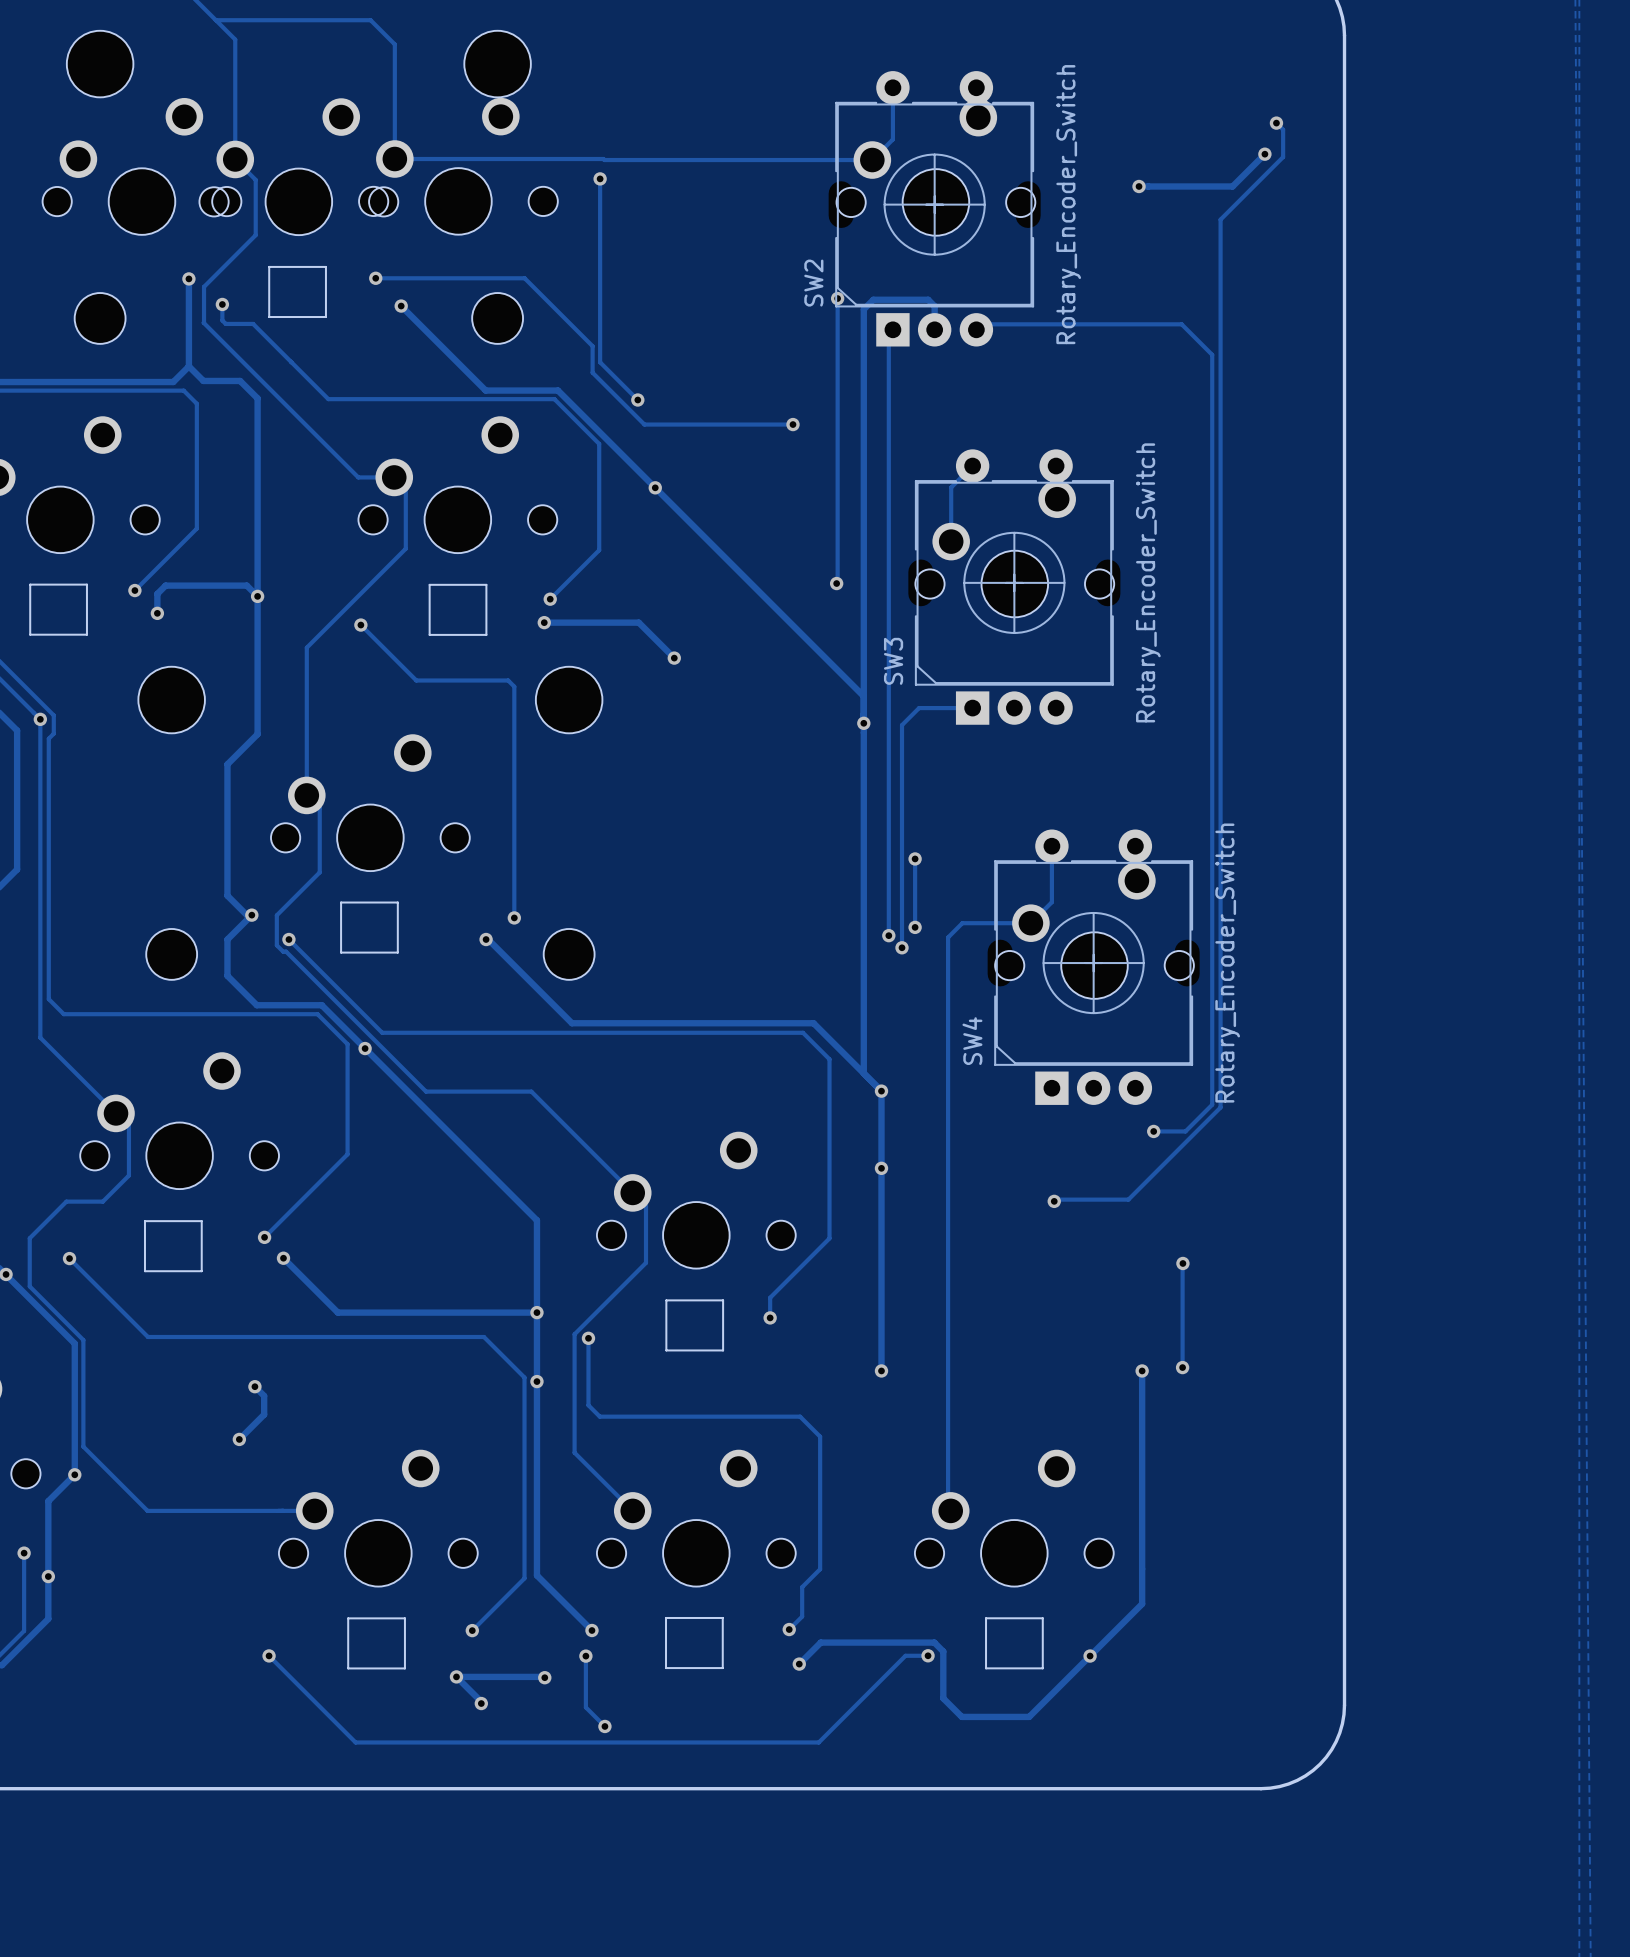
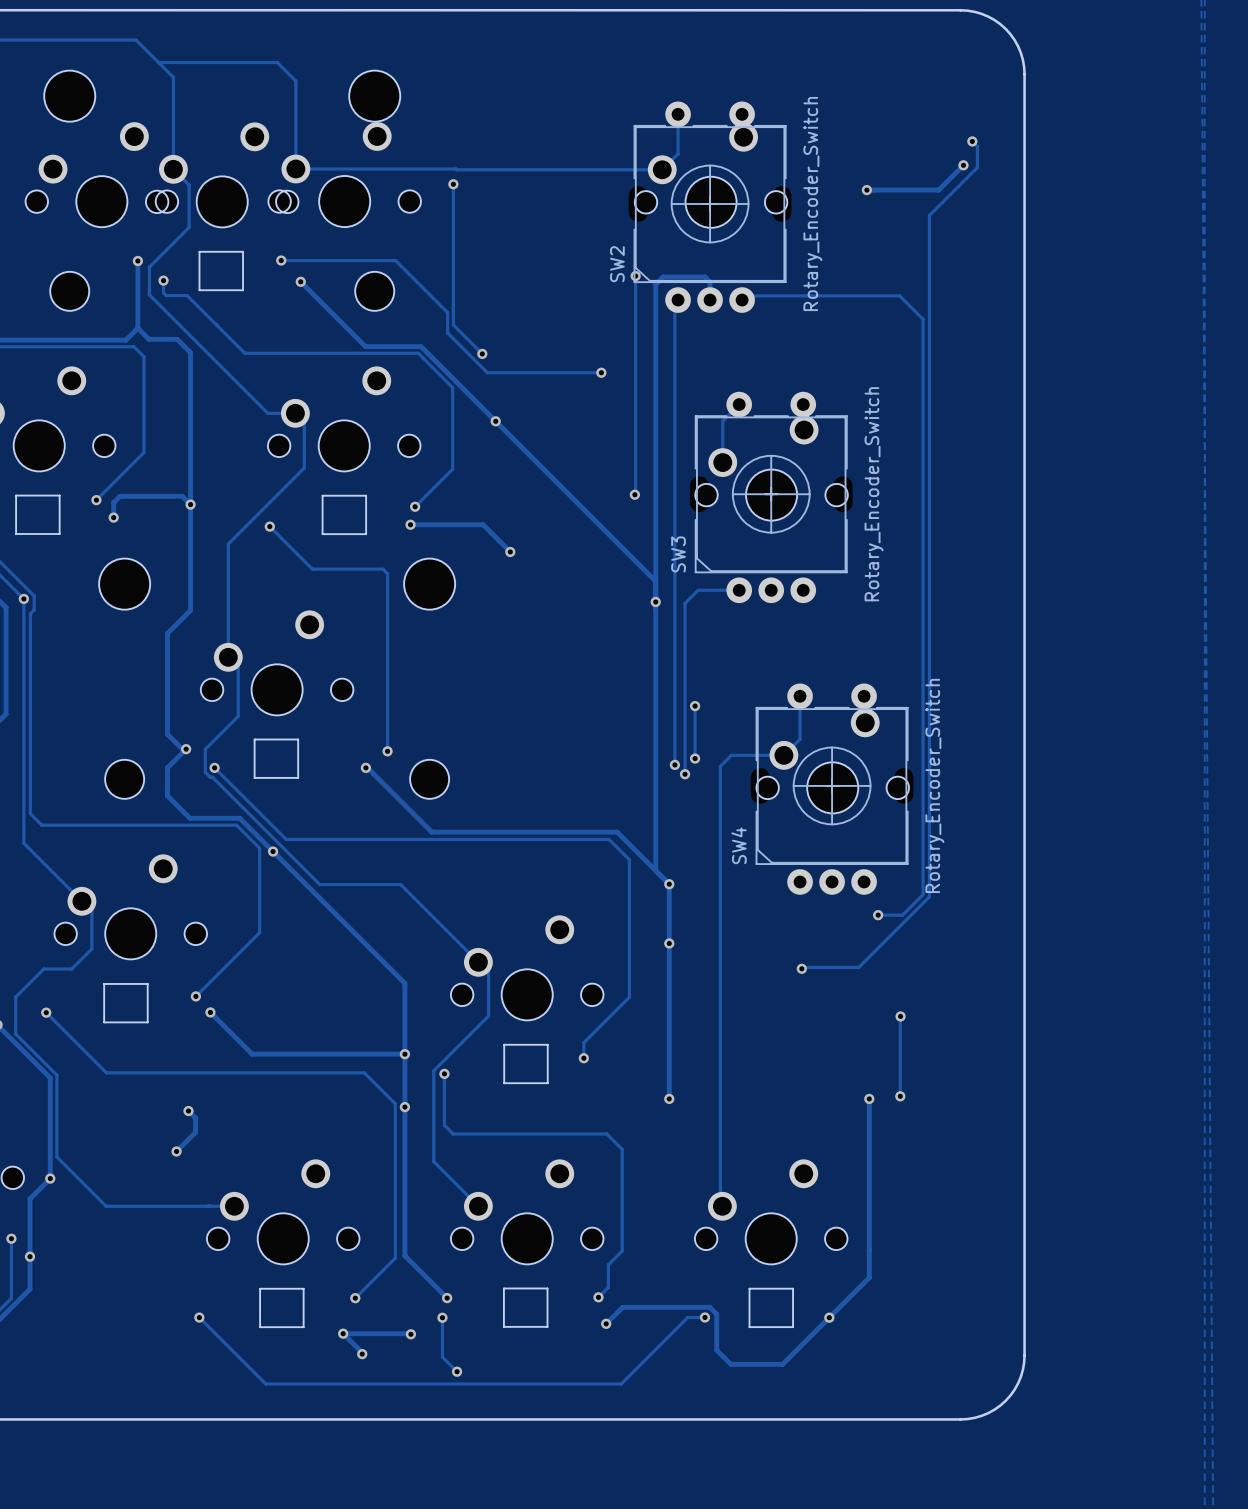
SW2 footprint: [828, 71, 1041, 347] -> [628, 101, 792, 313]
SW3 footprint: [908, 449, 1121, 725] -> [689, 391, 853, 604]
SW4 footprint: [987, 829, 1200, 1105] -> [750, 683, 914, 895]

